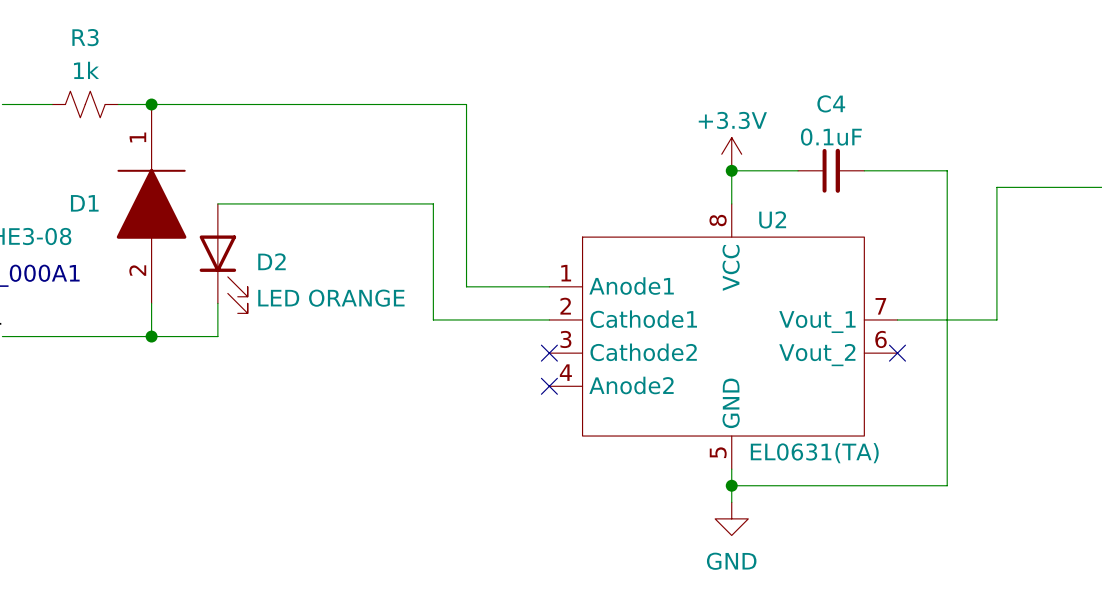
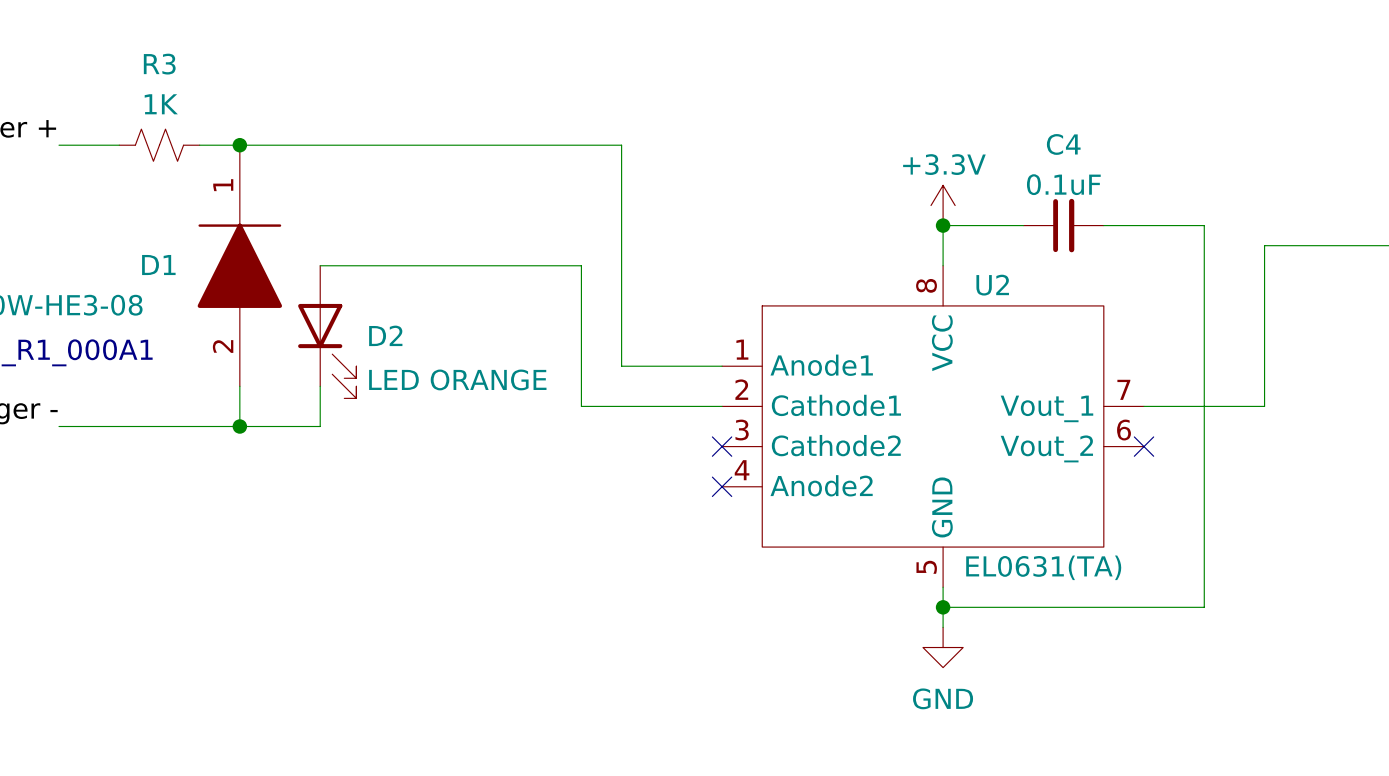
R3 value: 1k (86, 70) -> 1K (161, 104)

